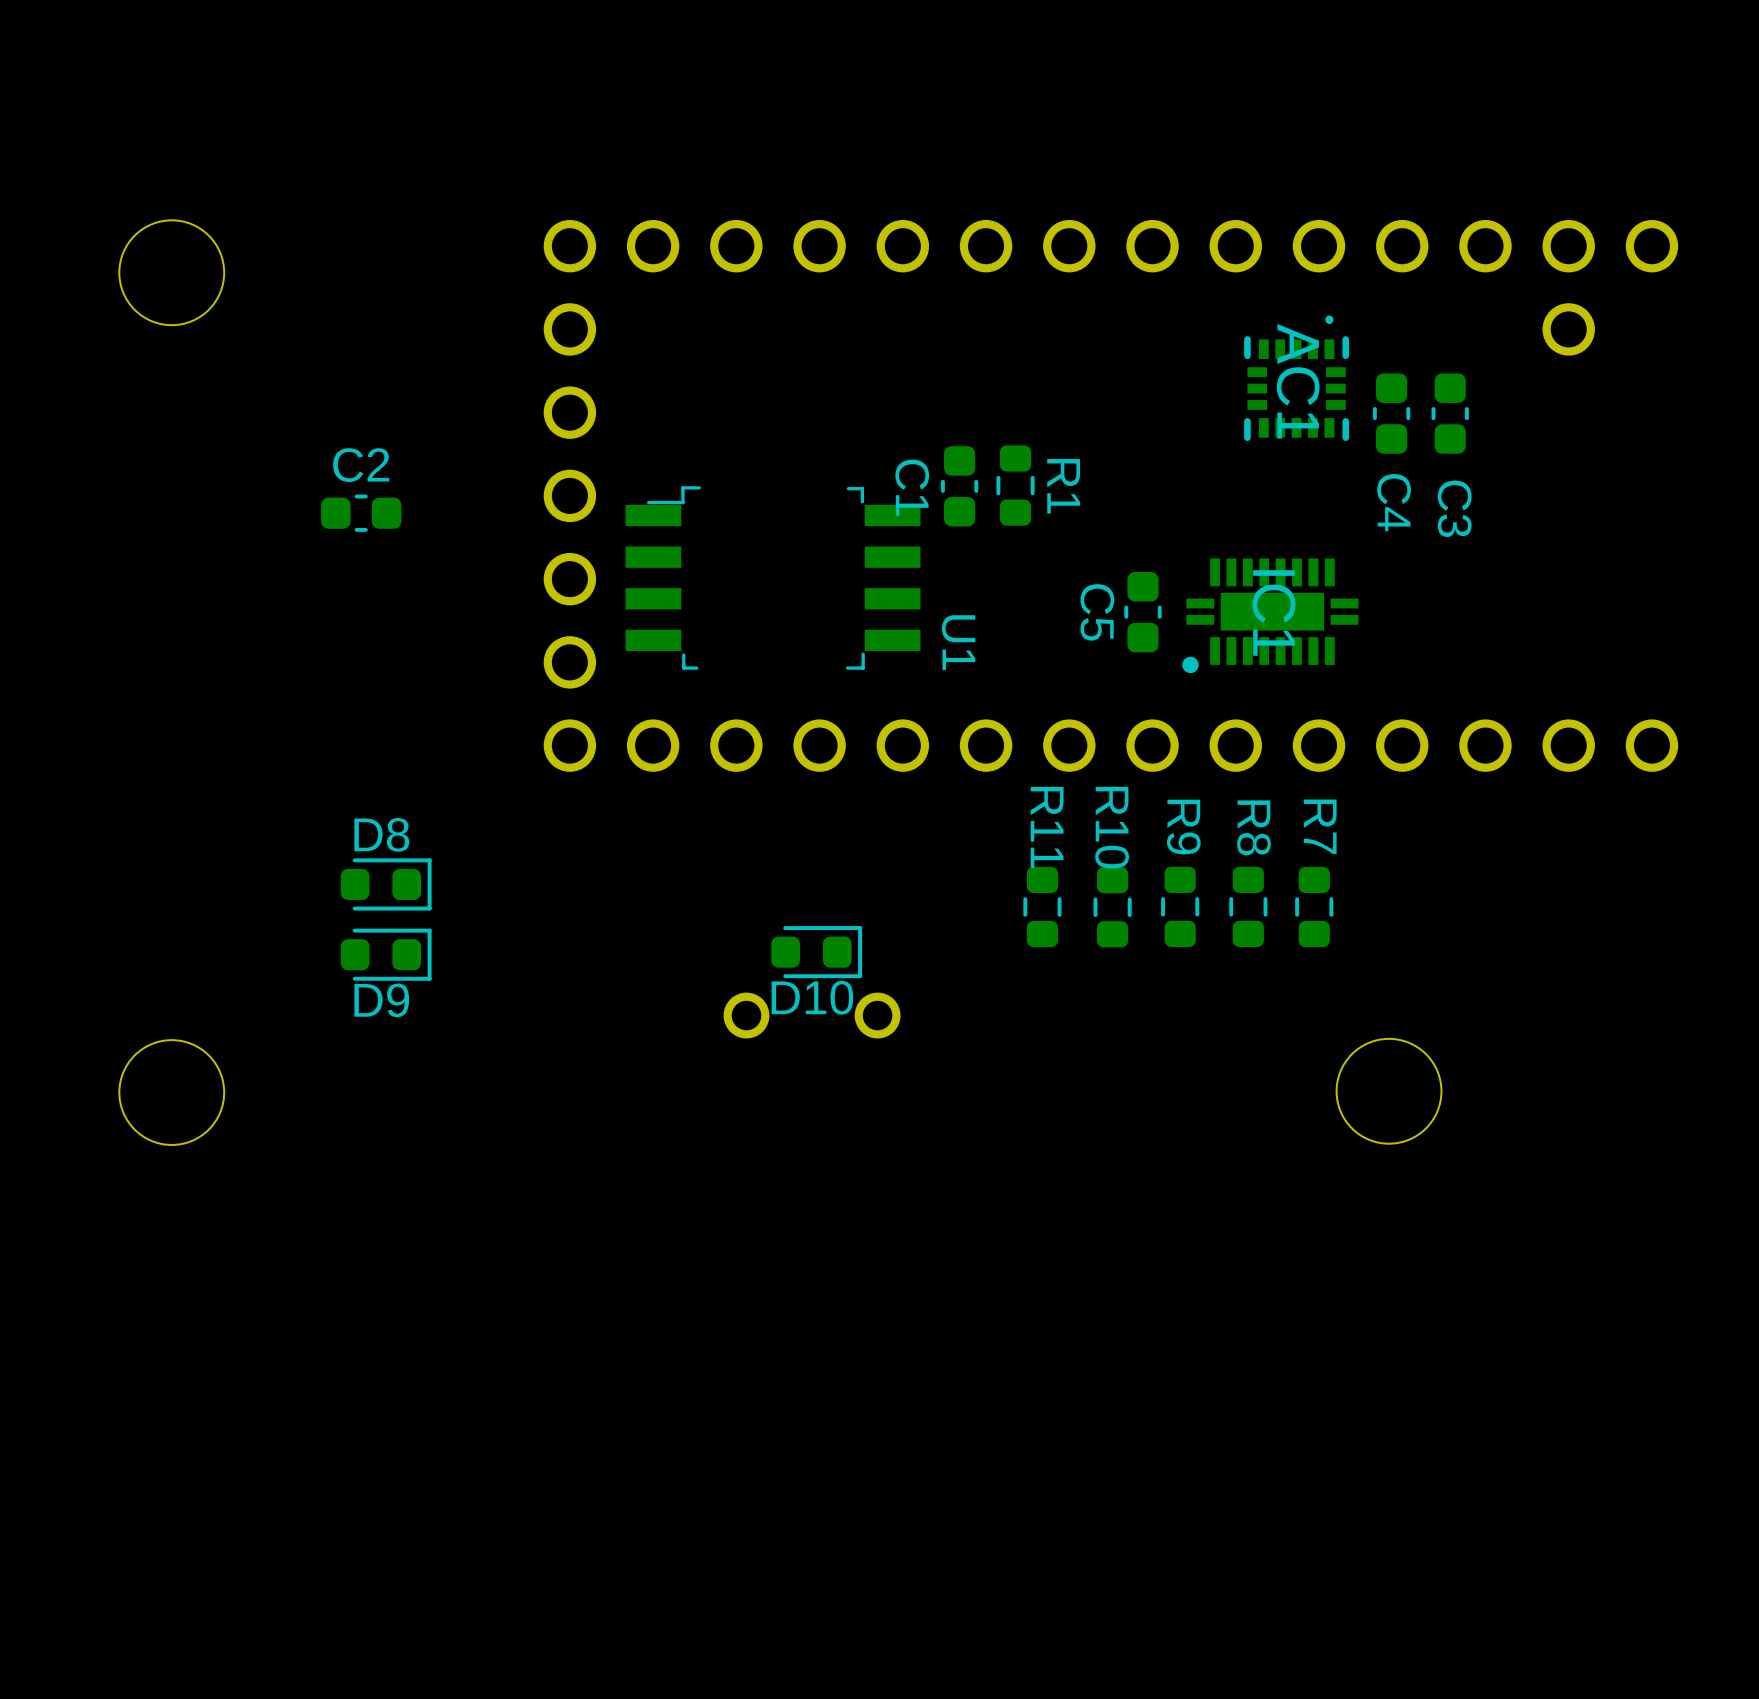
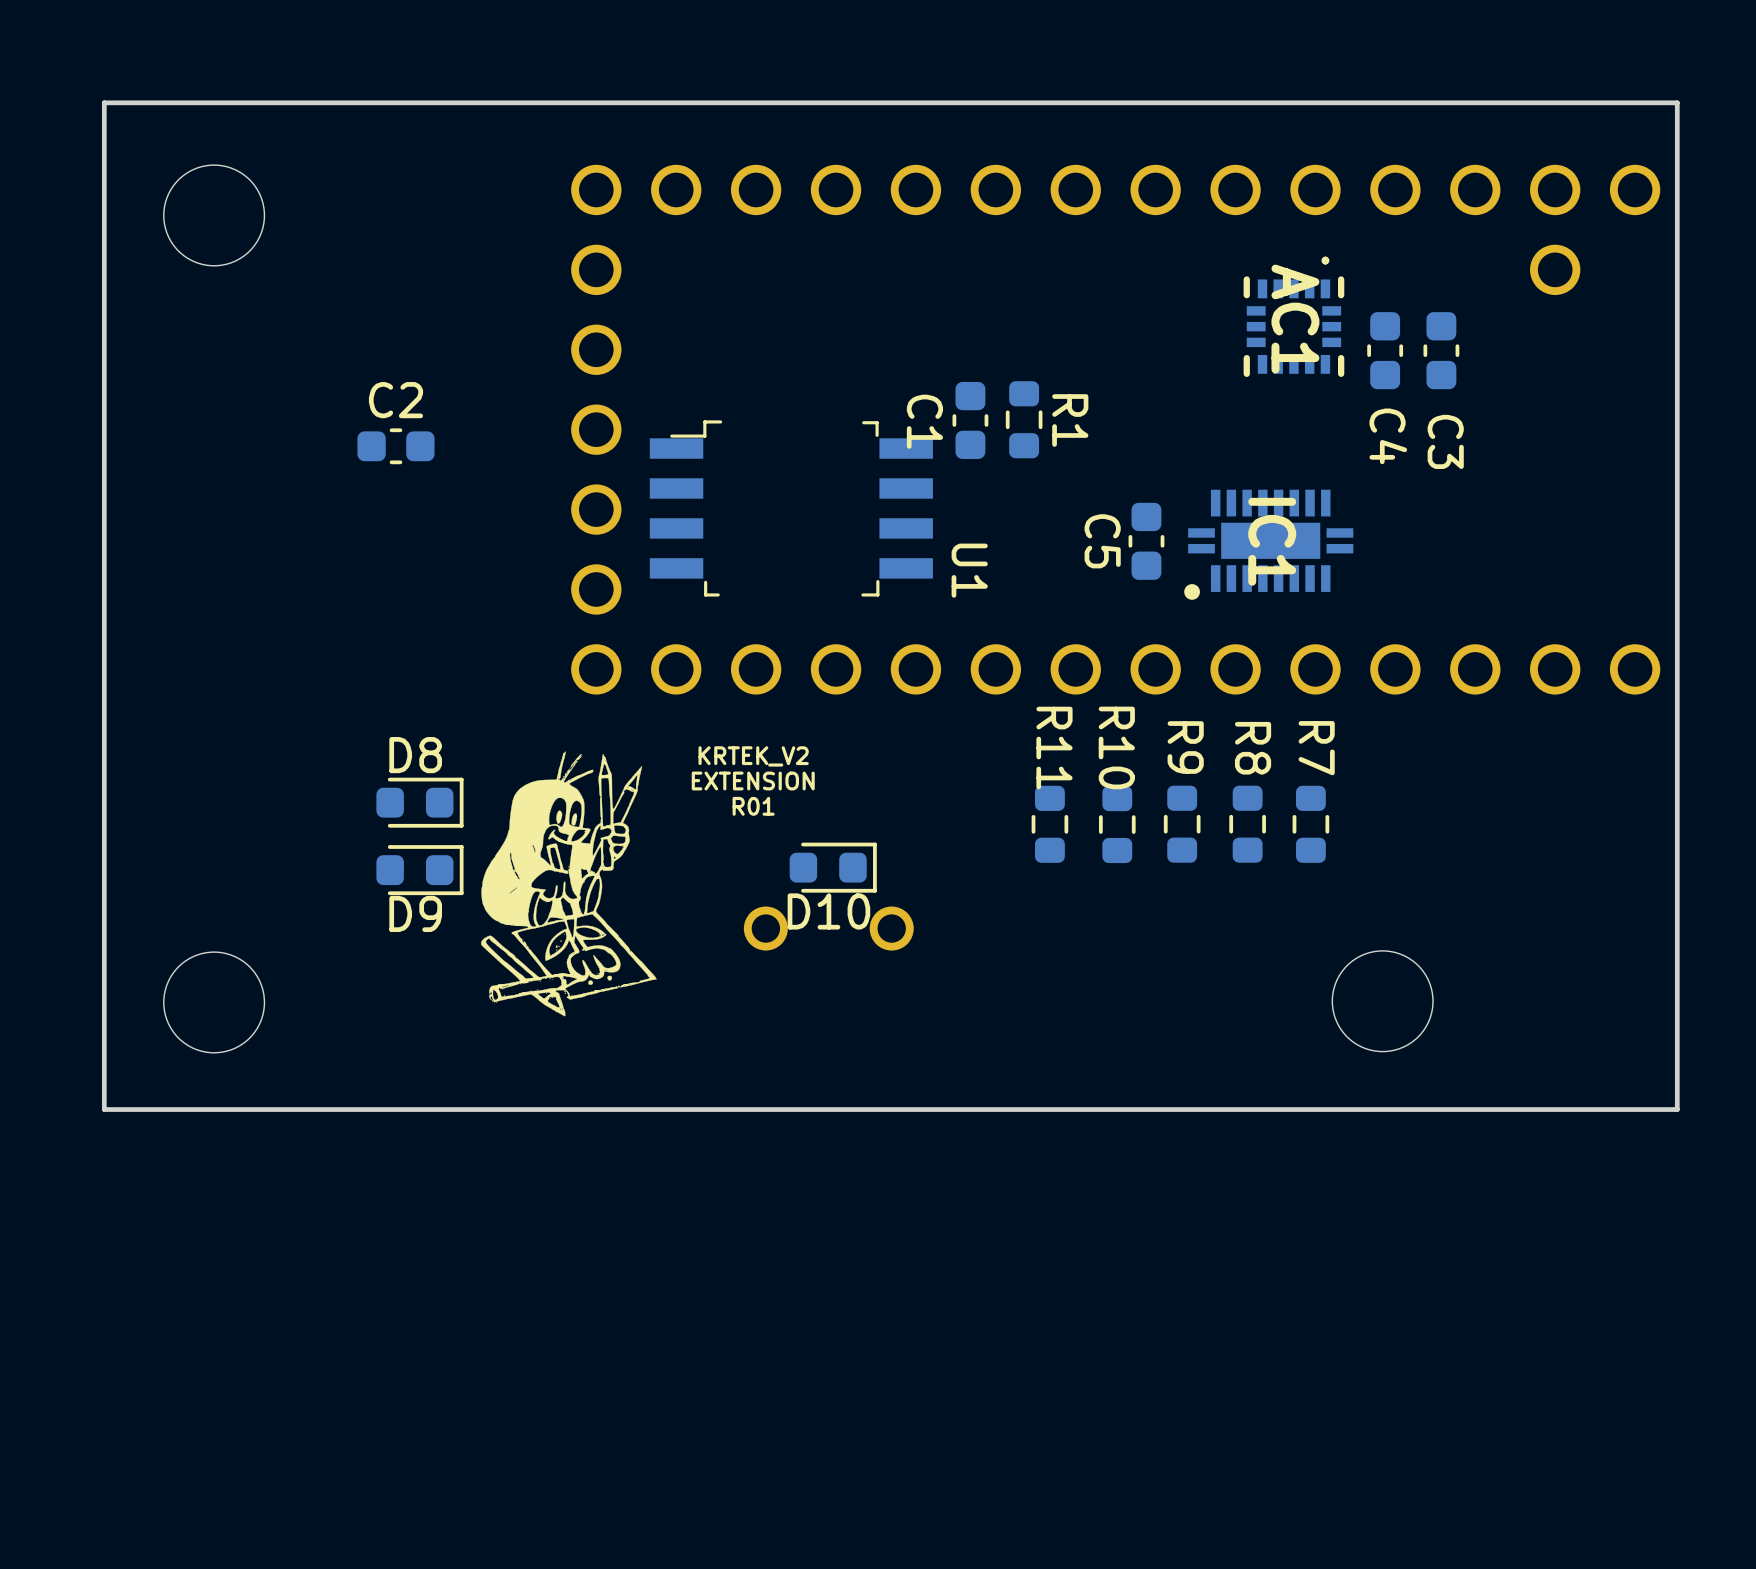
board edge: none -> (1677, 102) (1677, 1109) (104, 1109) (104, 102) (1677, 102)
drawing: none -> [480, 751, 657, 1017]
text: none -> KRTEK_V2 (753, 756)
text: none -> EXTENSION (753, 780)
text: none -> R01 (753, 806)

